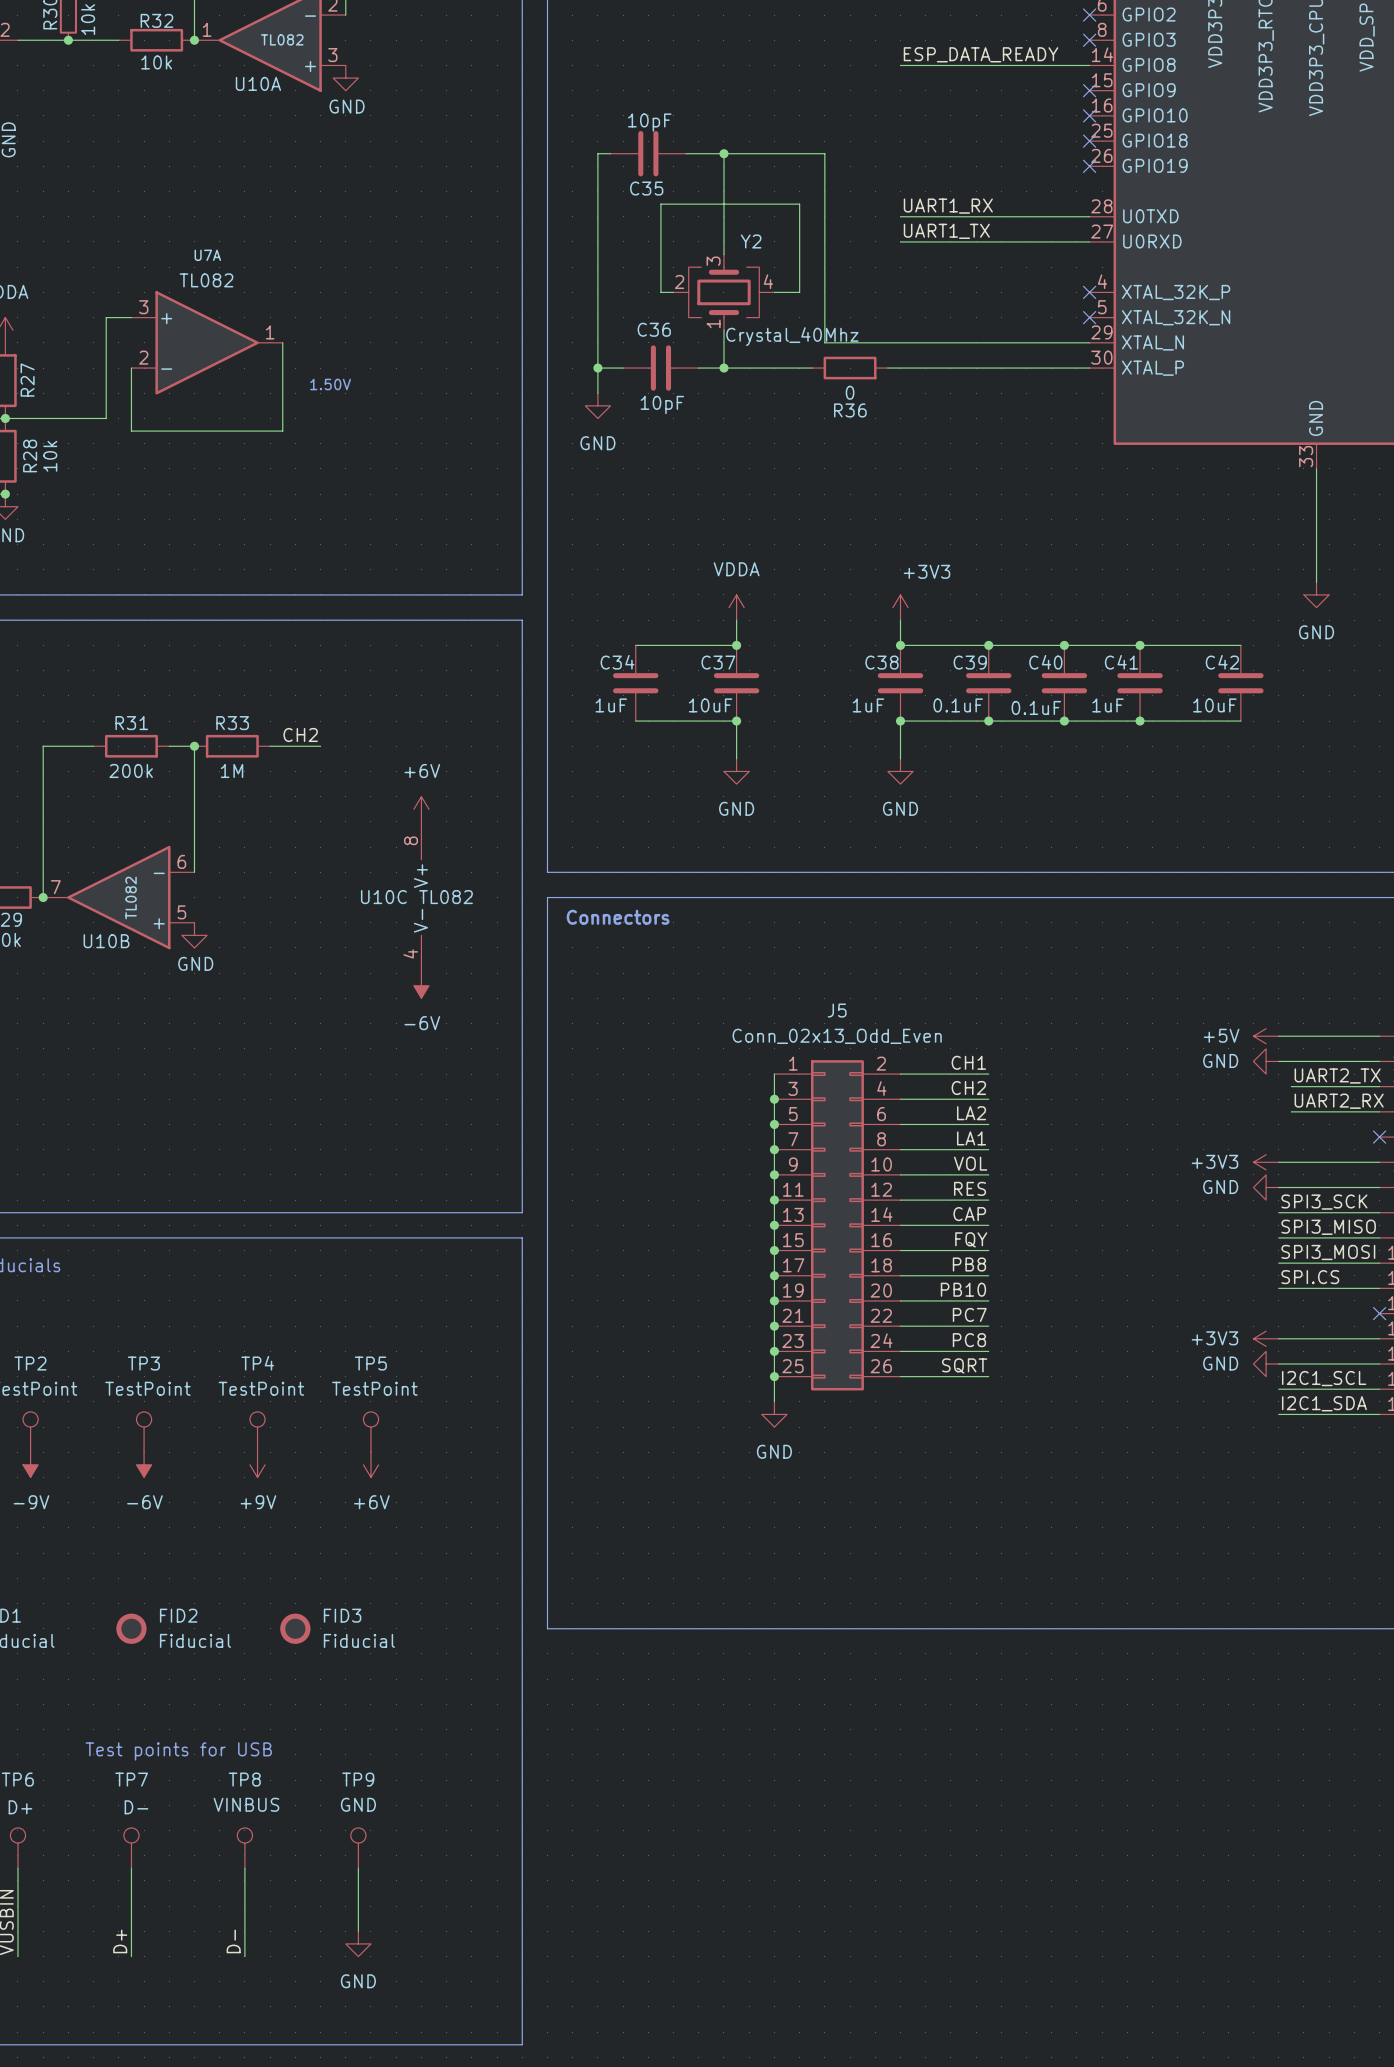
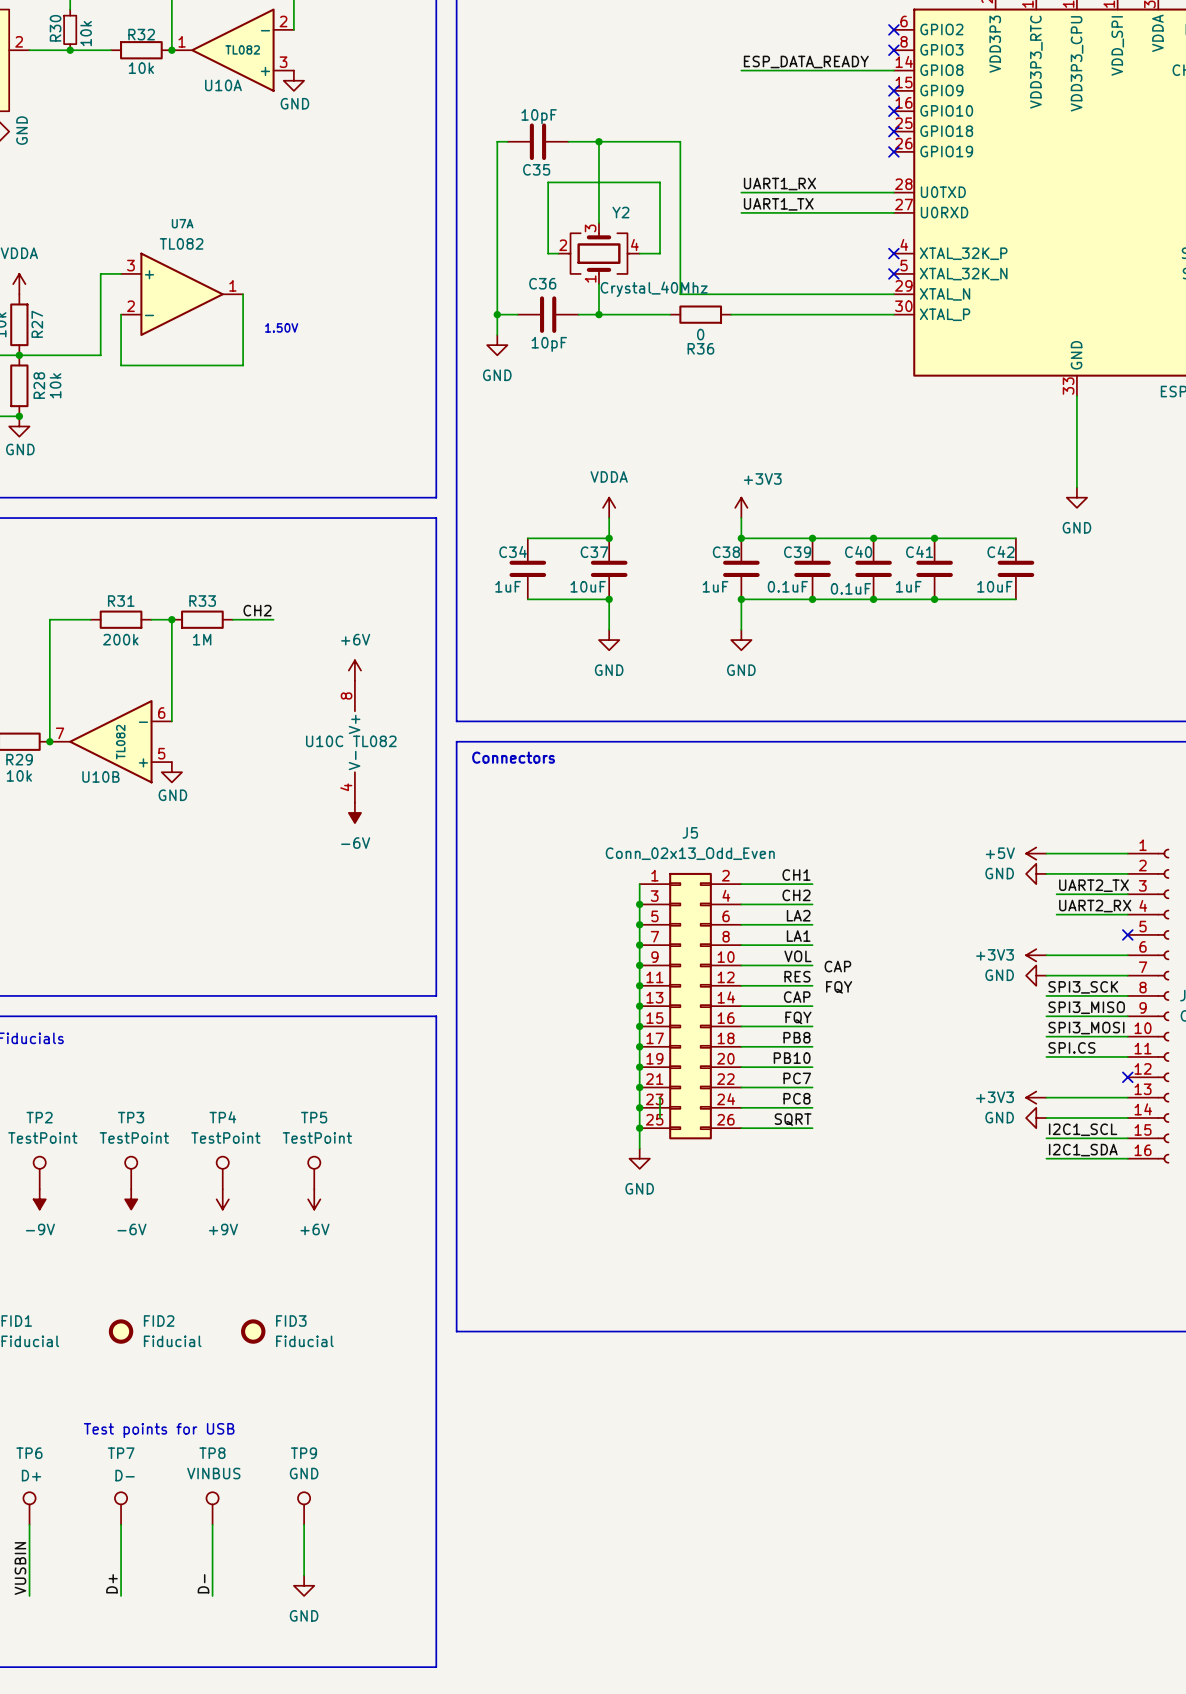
label: none -> CAP (837, 966)
label: none -> FQY (839, 987)
wire: none -> (660, 1097) (660, 1118)

